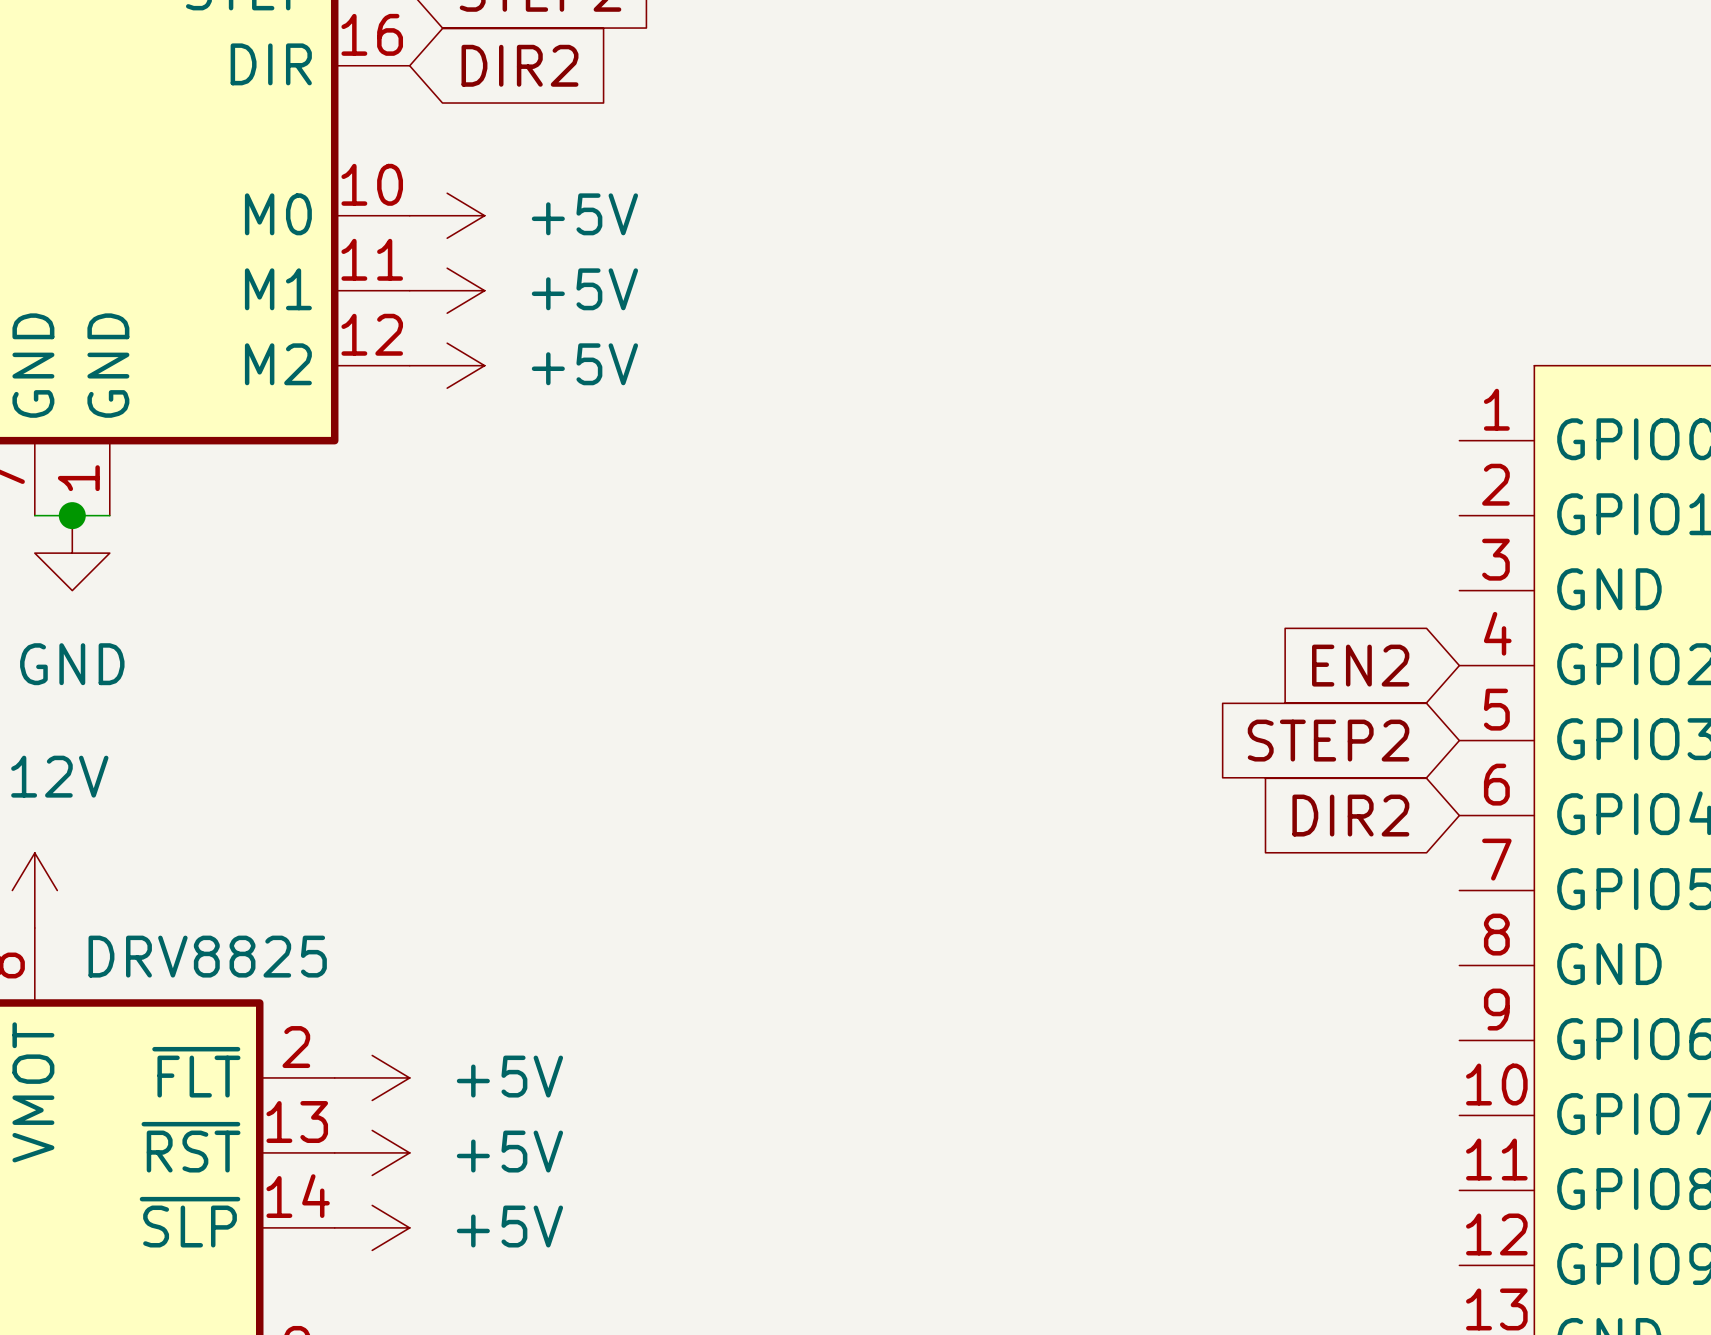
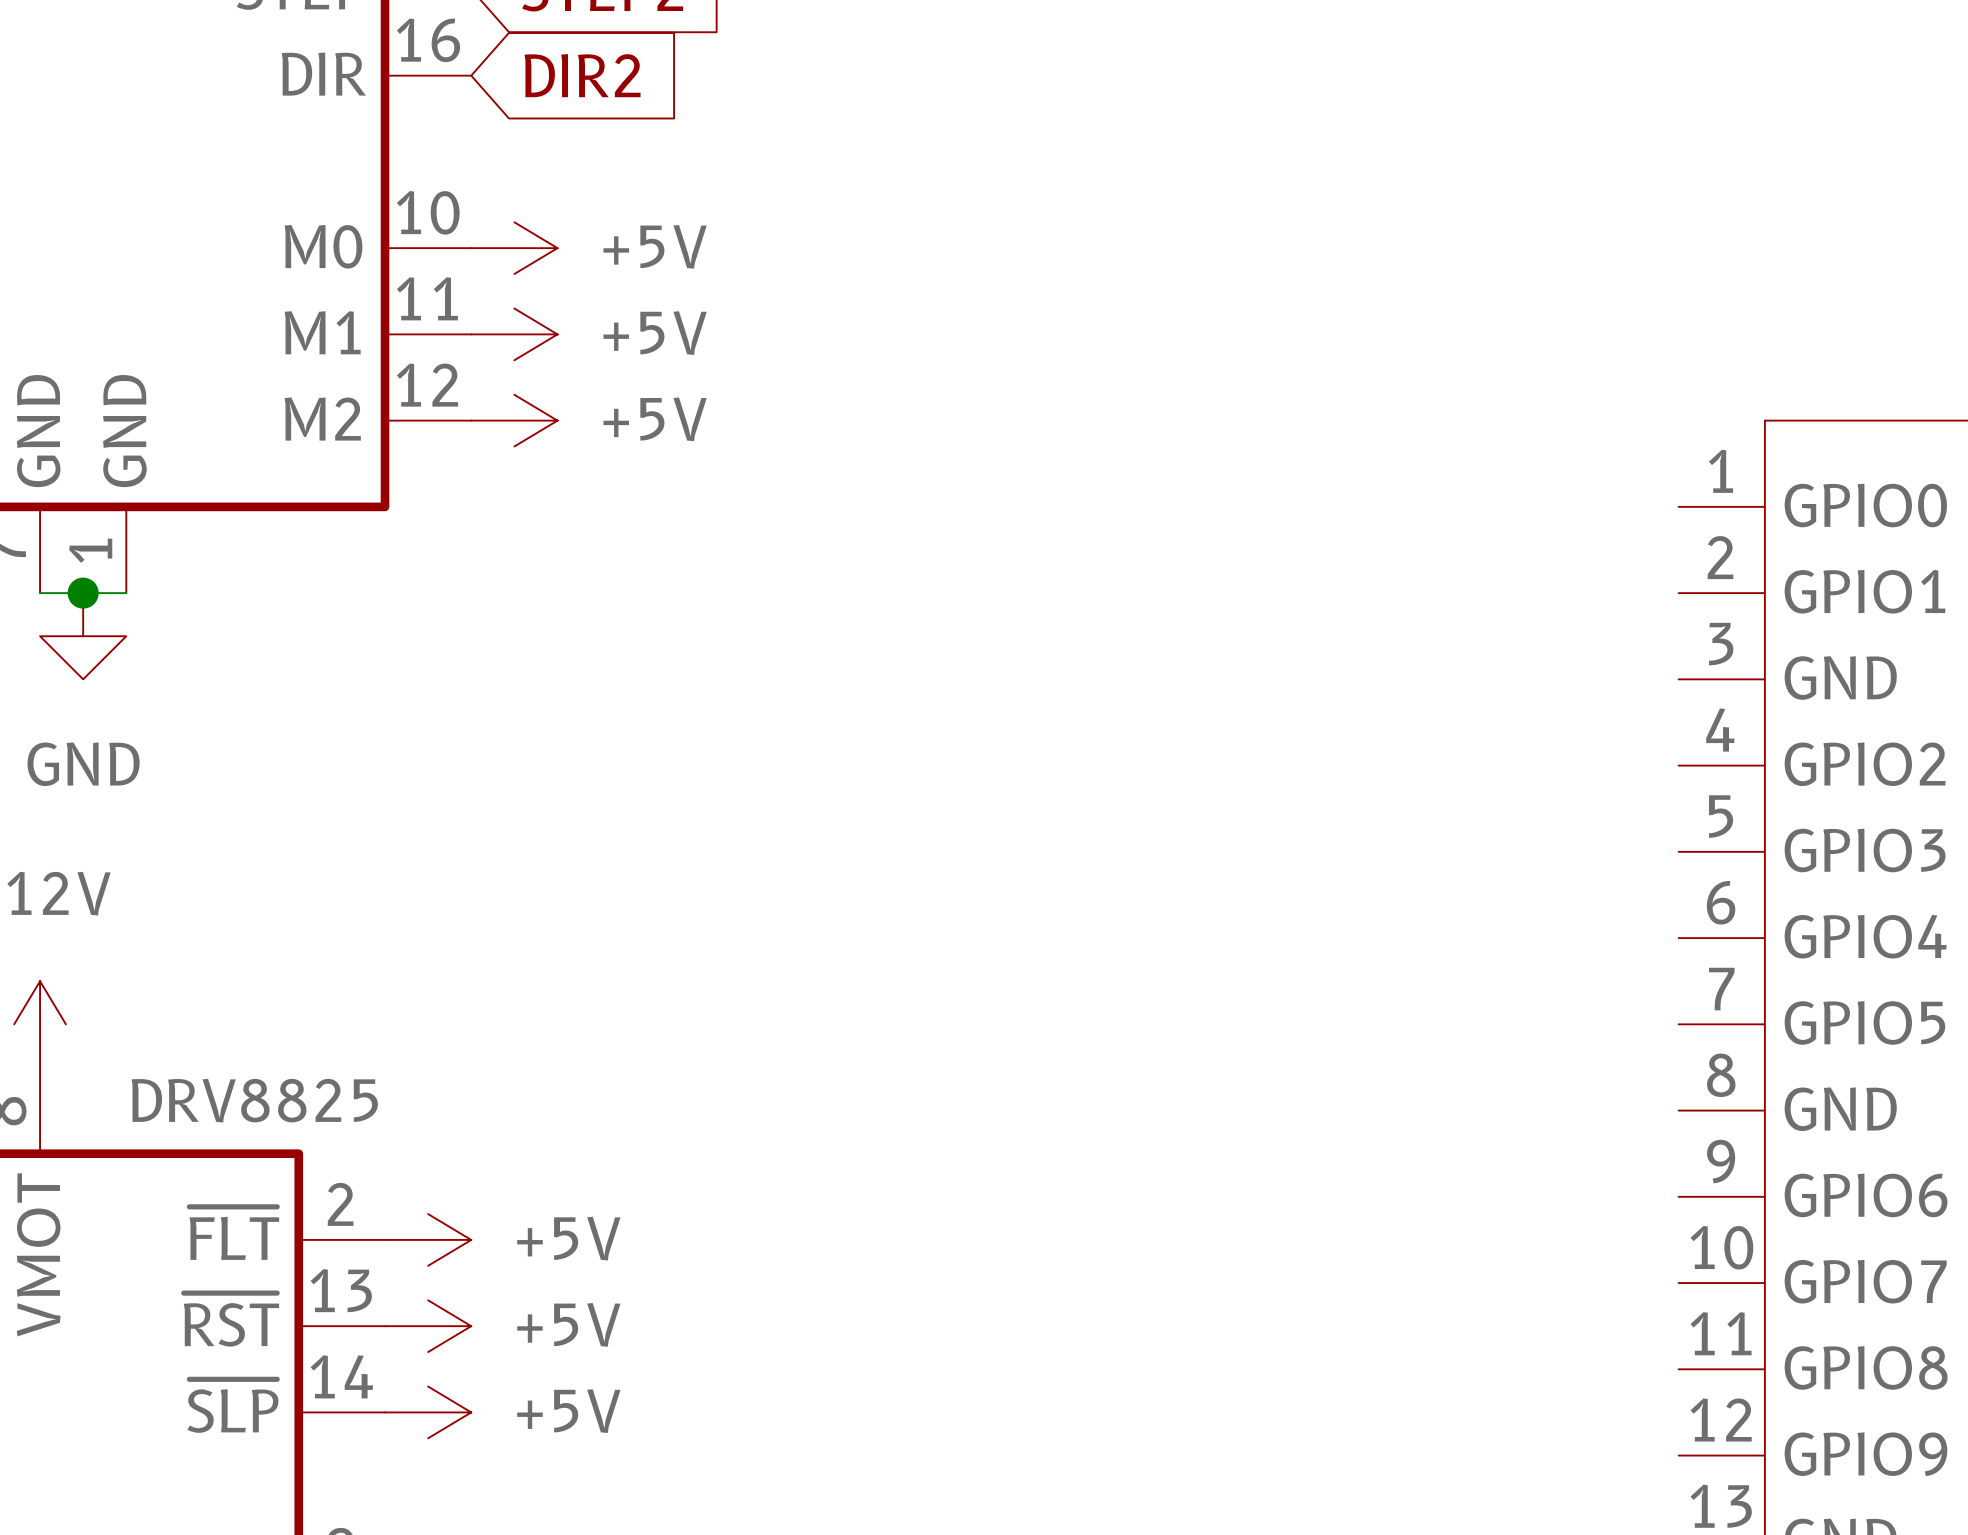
global label: EN2 (1360, 665) -> none
global label: STEP2 (1328, 740) -> none
global label: DIR2 (1350, 815) -> none

